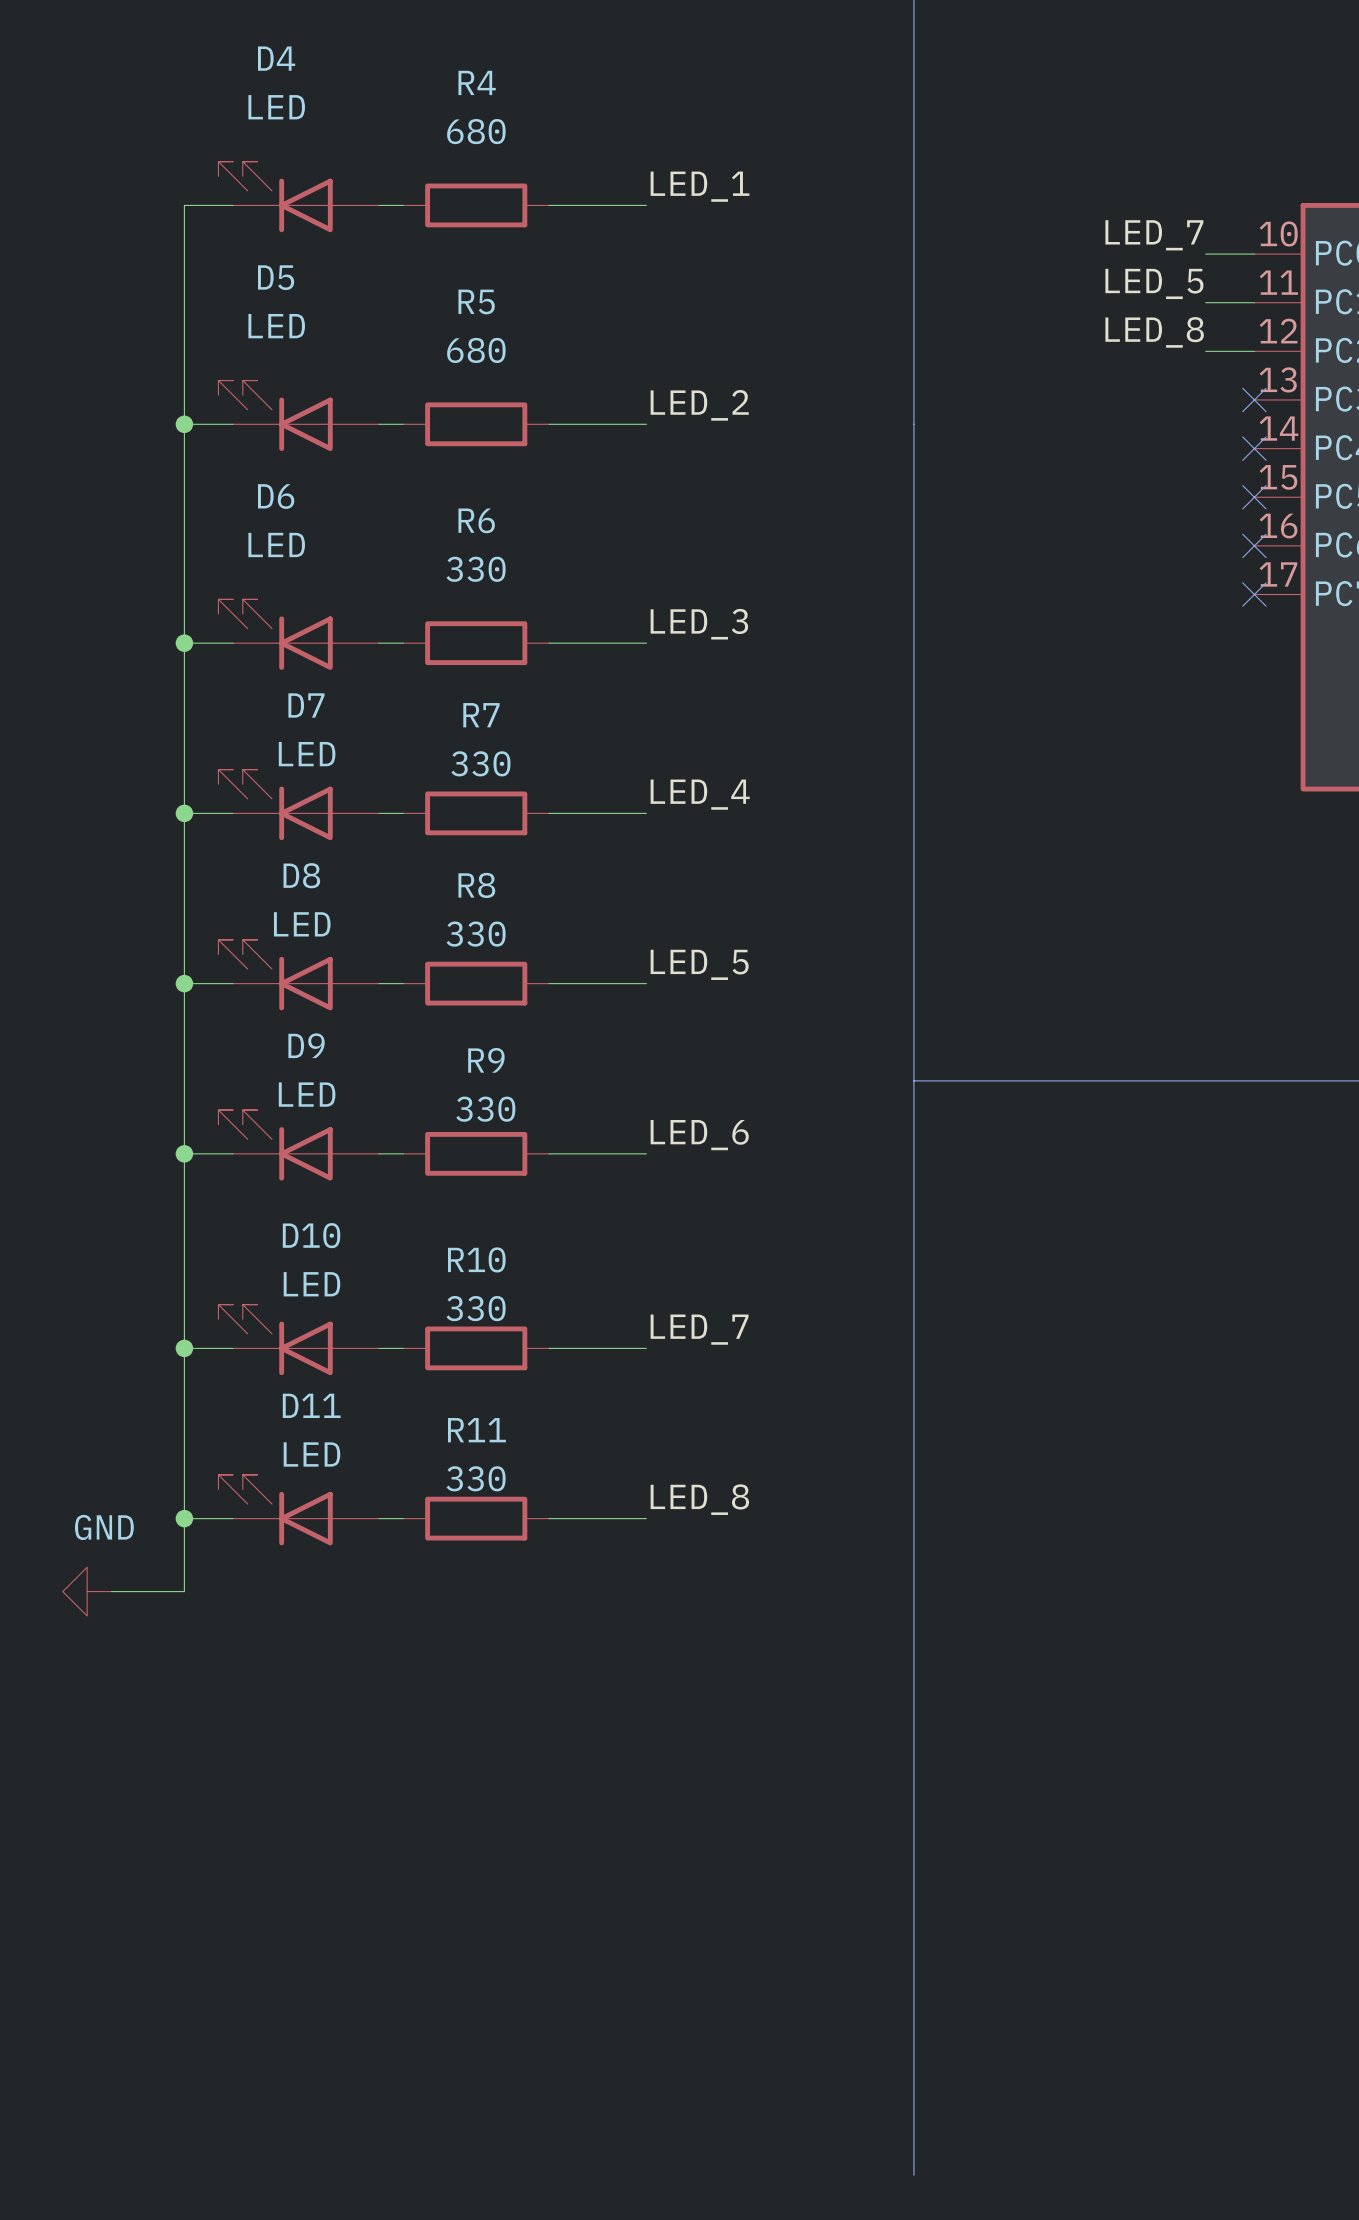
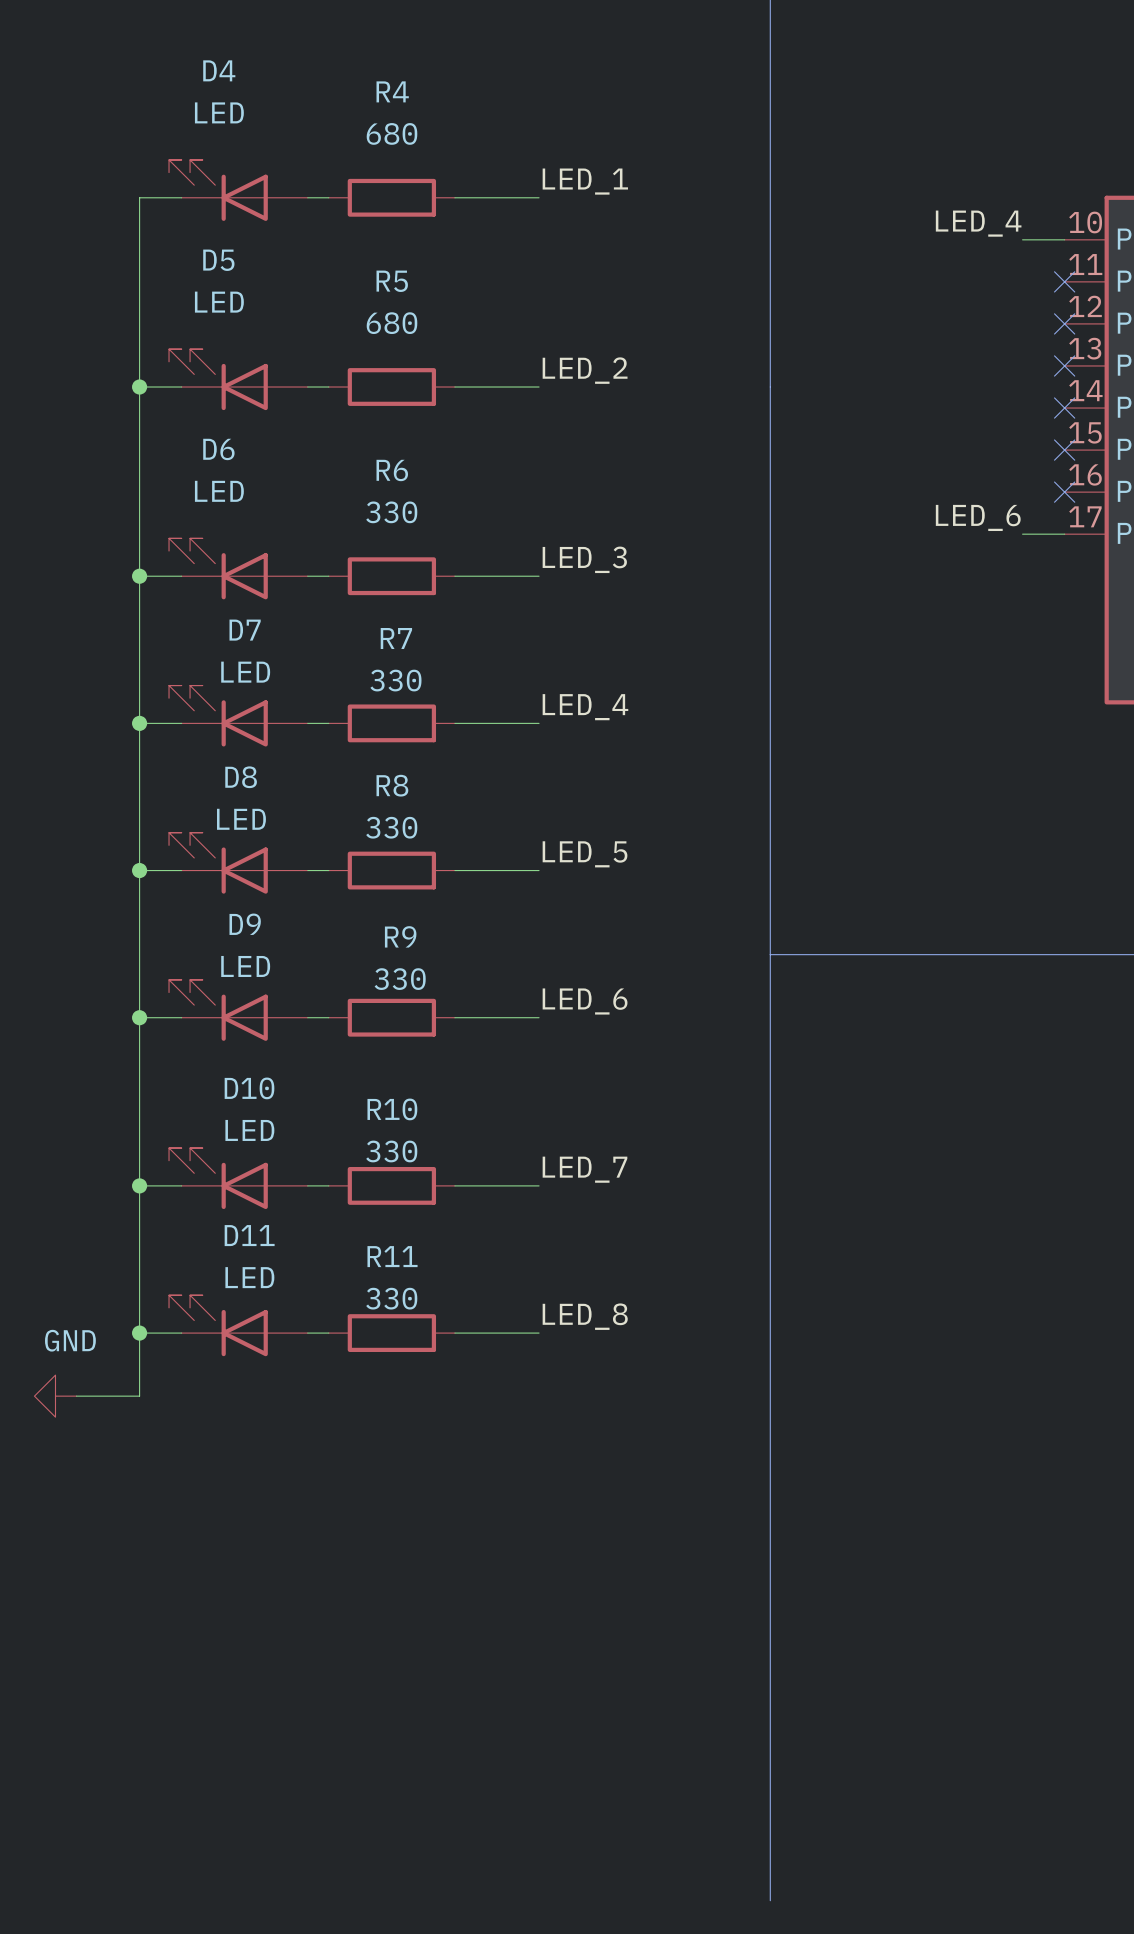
label: LED_7 (1154, 235) -> LED_4 (978, 223)
label: LED_5 (1154, 283) -> none
wire: (1205, 302) (1254, 302) -> none
no-connect mark: none -> (1064, 281)
label: LED_8 (1154, 332) -> none
wire: (1205, 351) (1254, 351) -> (1022, 534) (1064, 534)
no-connect mark: none -> (1064, 323)
label: none -> LED_6 (978, 517)
no-connect mark: (1254, 594) -> none

